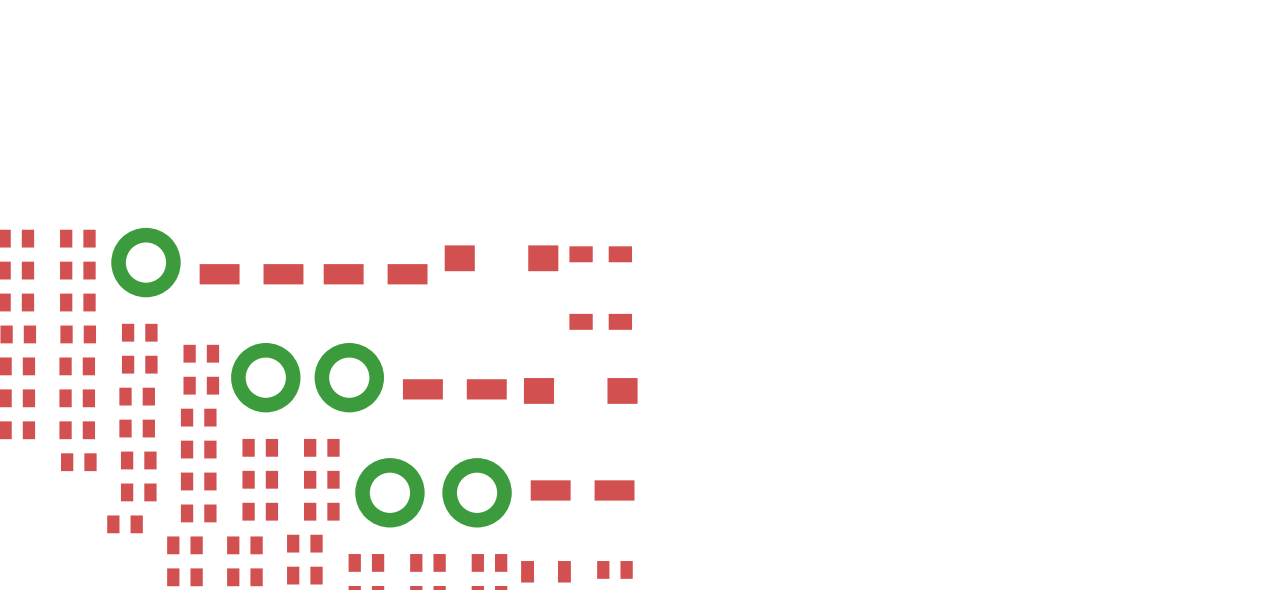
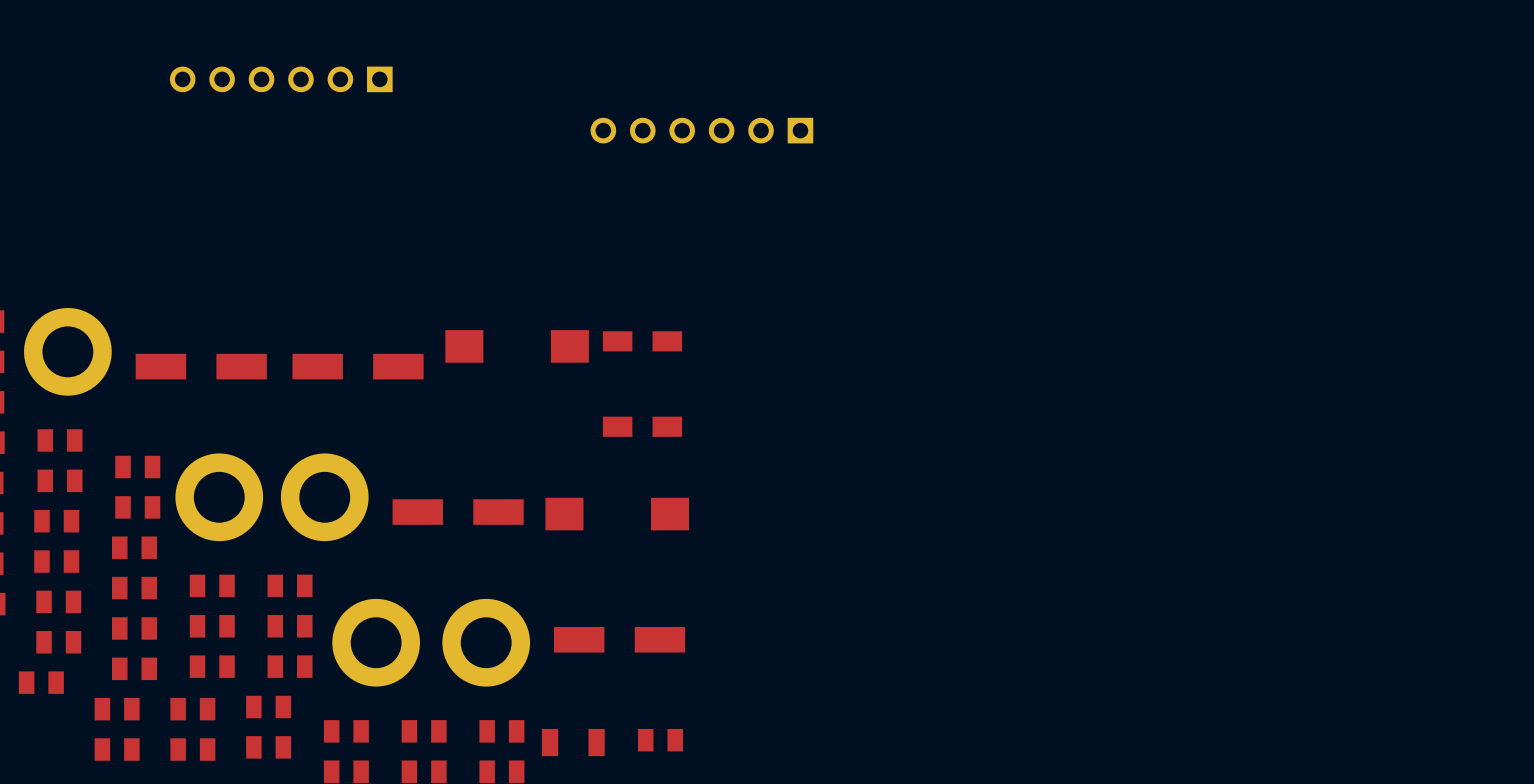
part: none -> (281, 79)
part: none -> (701, 130)

